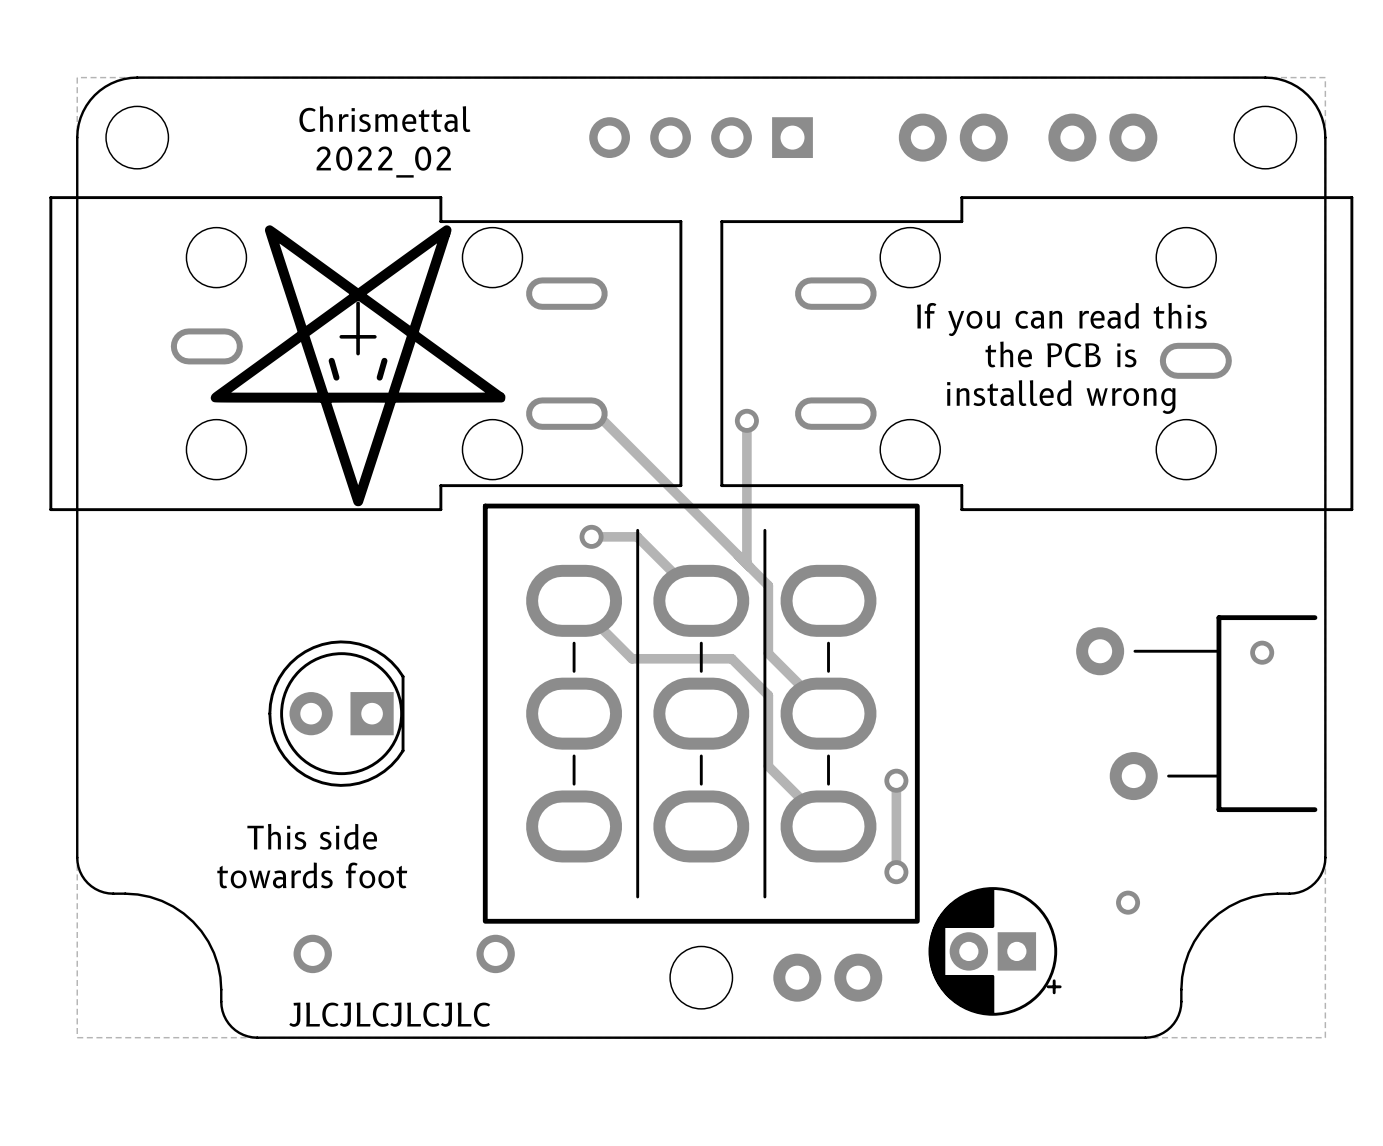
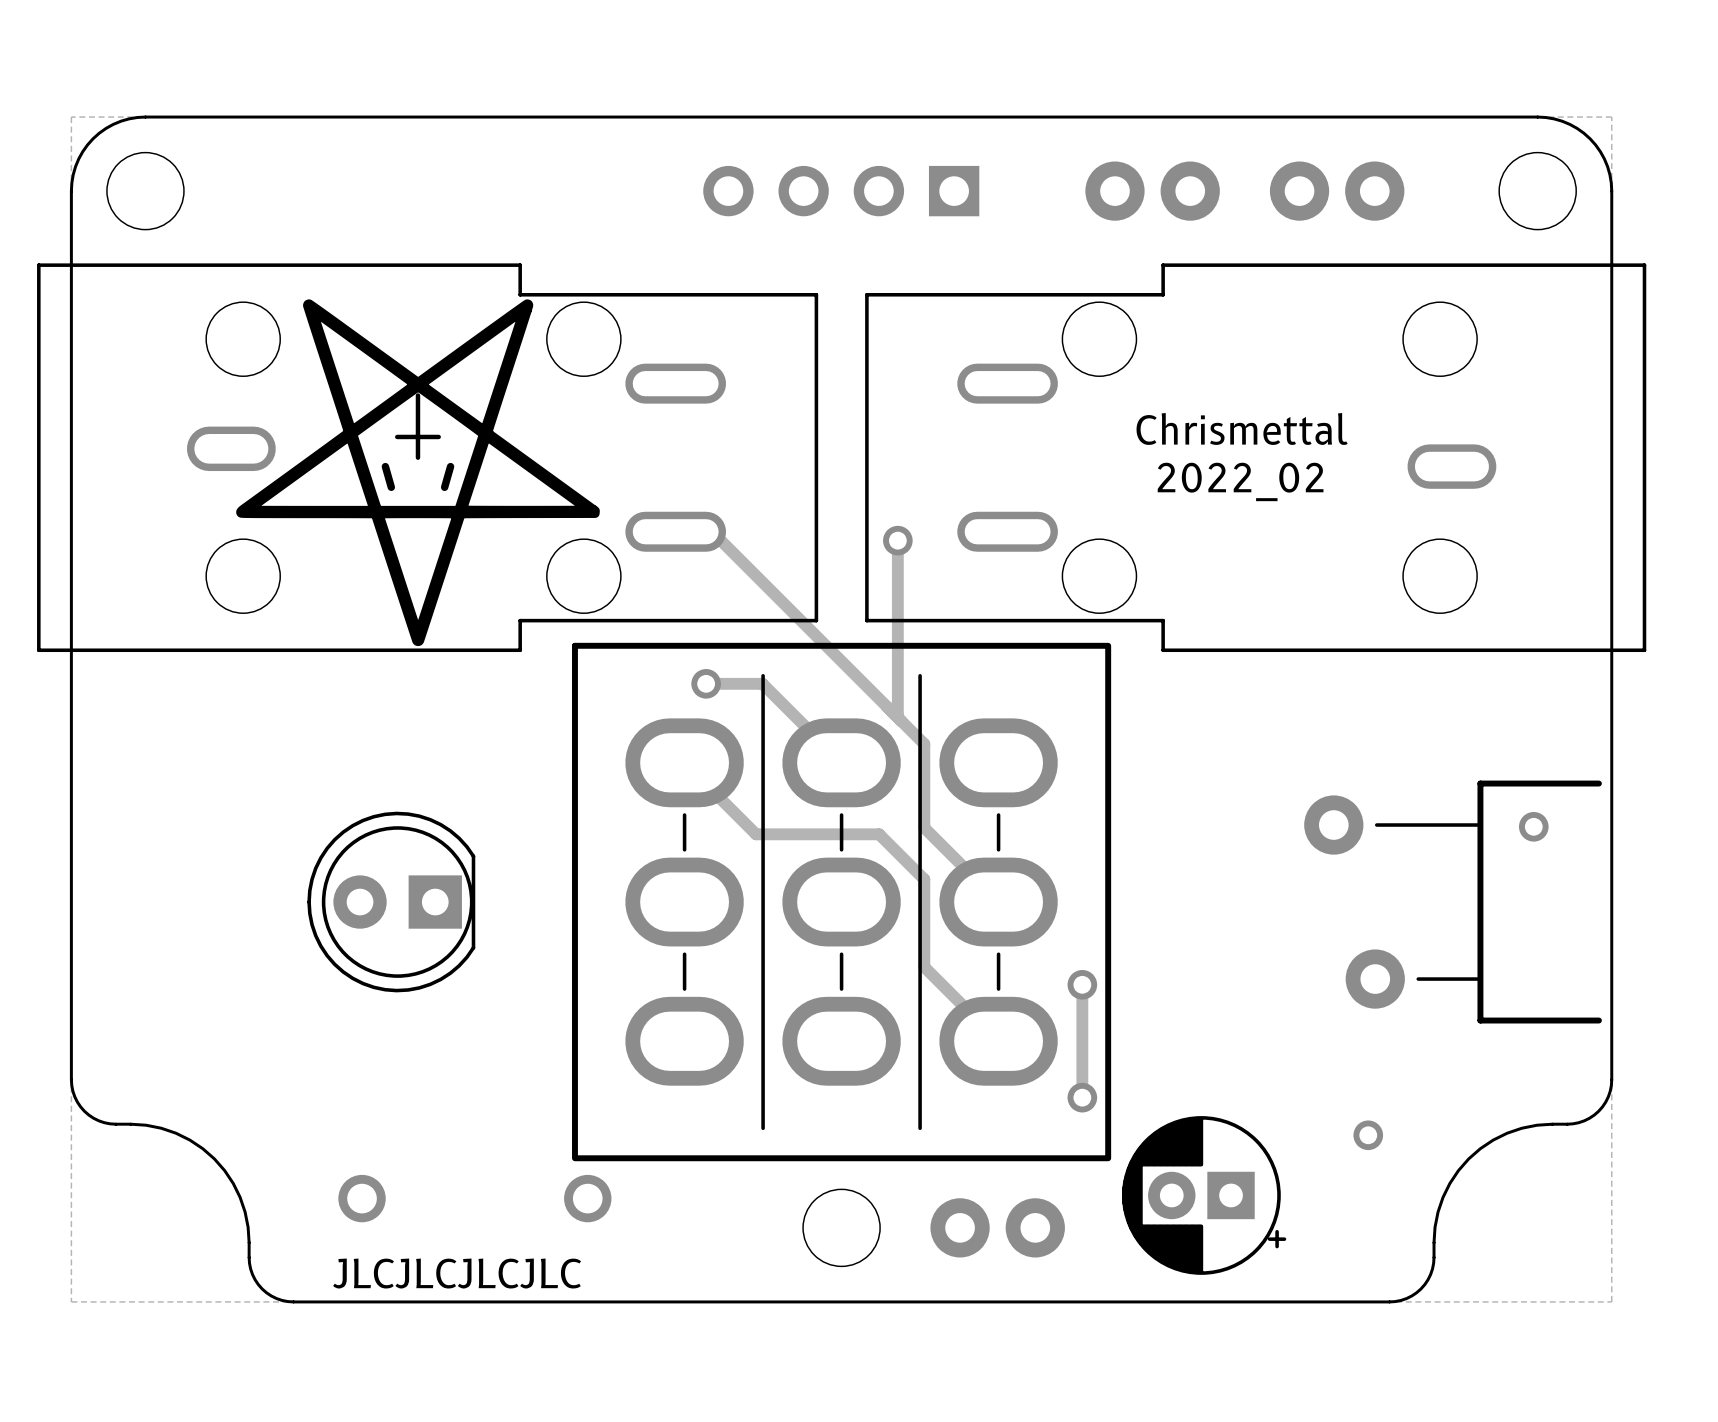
text: Chrismettal (384, 119) -> none
text: 2022_02 (383, 162) -> none
text: If you can read this (1061, 319) -> none
text: none -> Chrismettal (1242, 428)
text: the PCB is (1060, 354) -> none
text: none -> 2022_02 (1240, 481)
text: installed wrong (1061, 397) -> none
text: This side (312, 836) -> none
text: towards foot (312, 875) -> none

